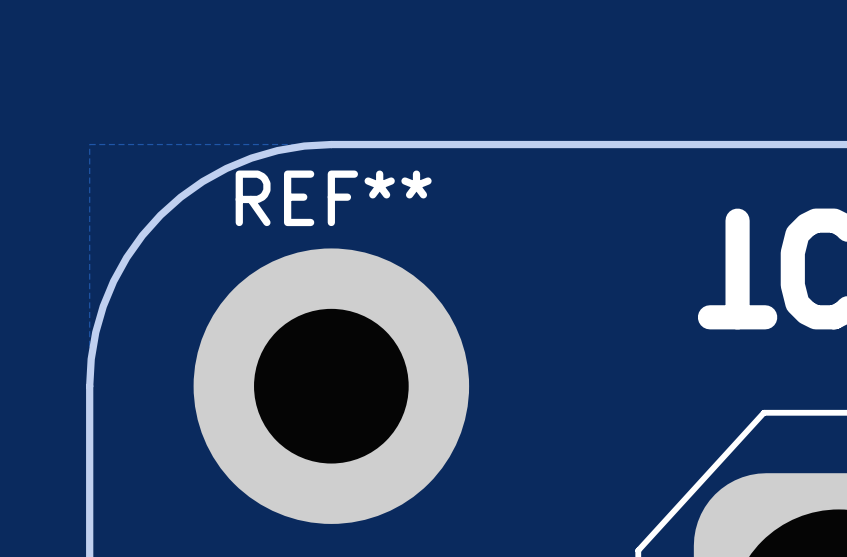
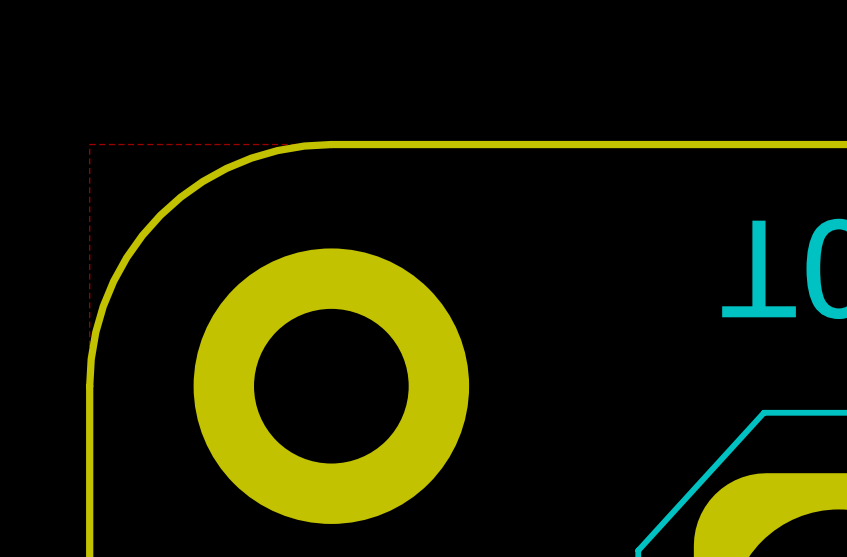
REF** name: REF** (333, 198) -> none

